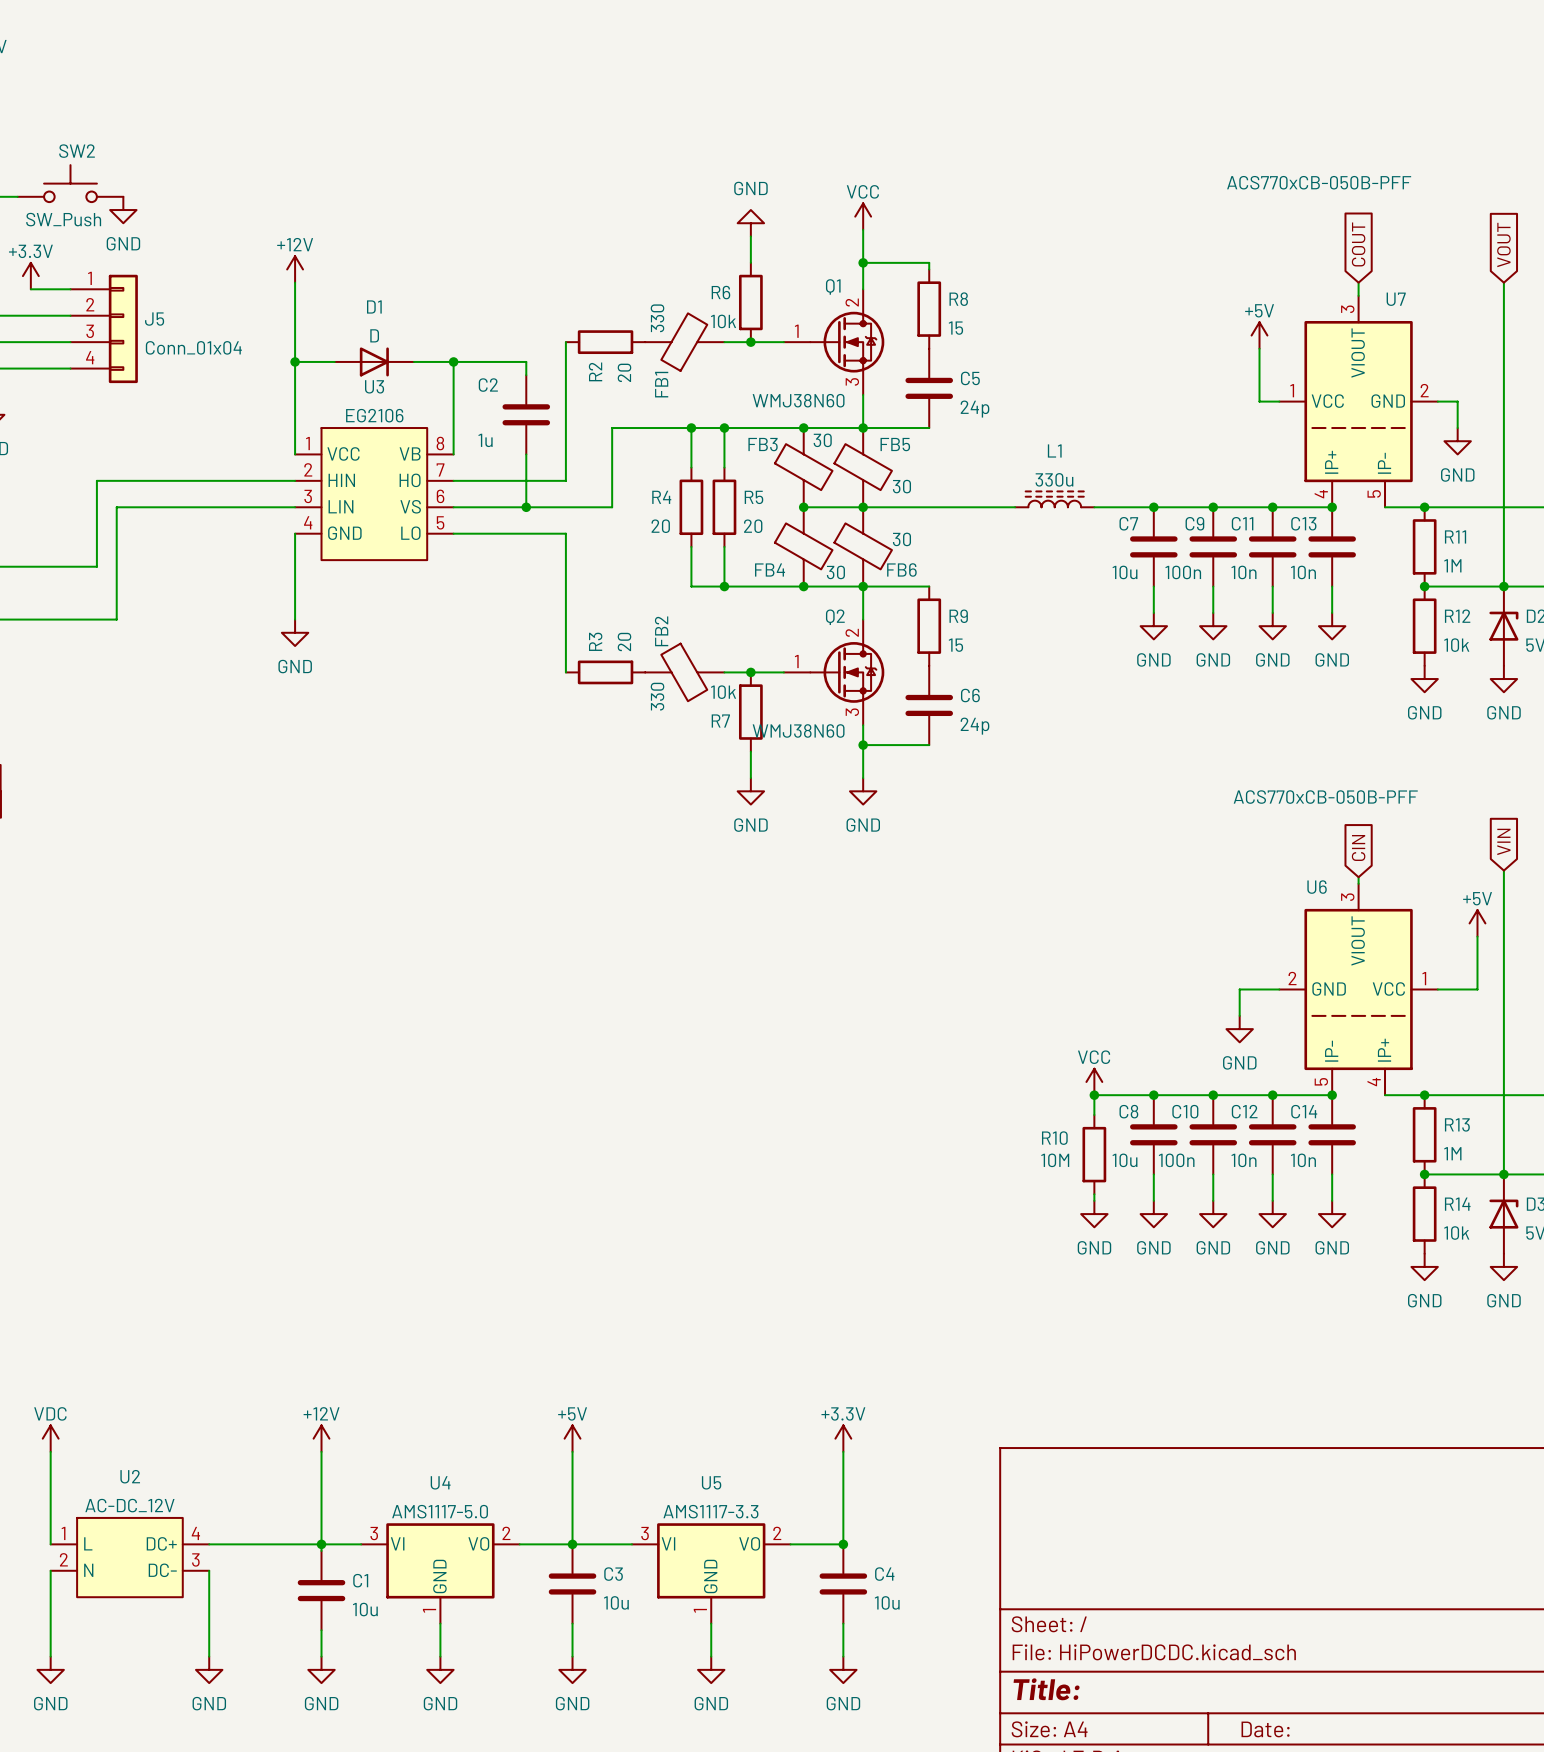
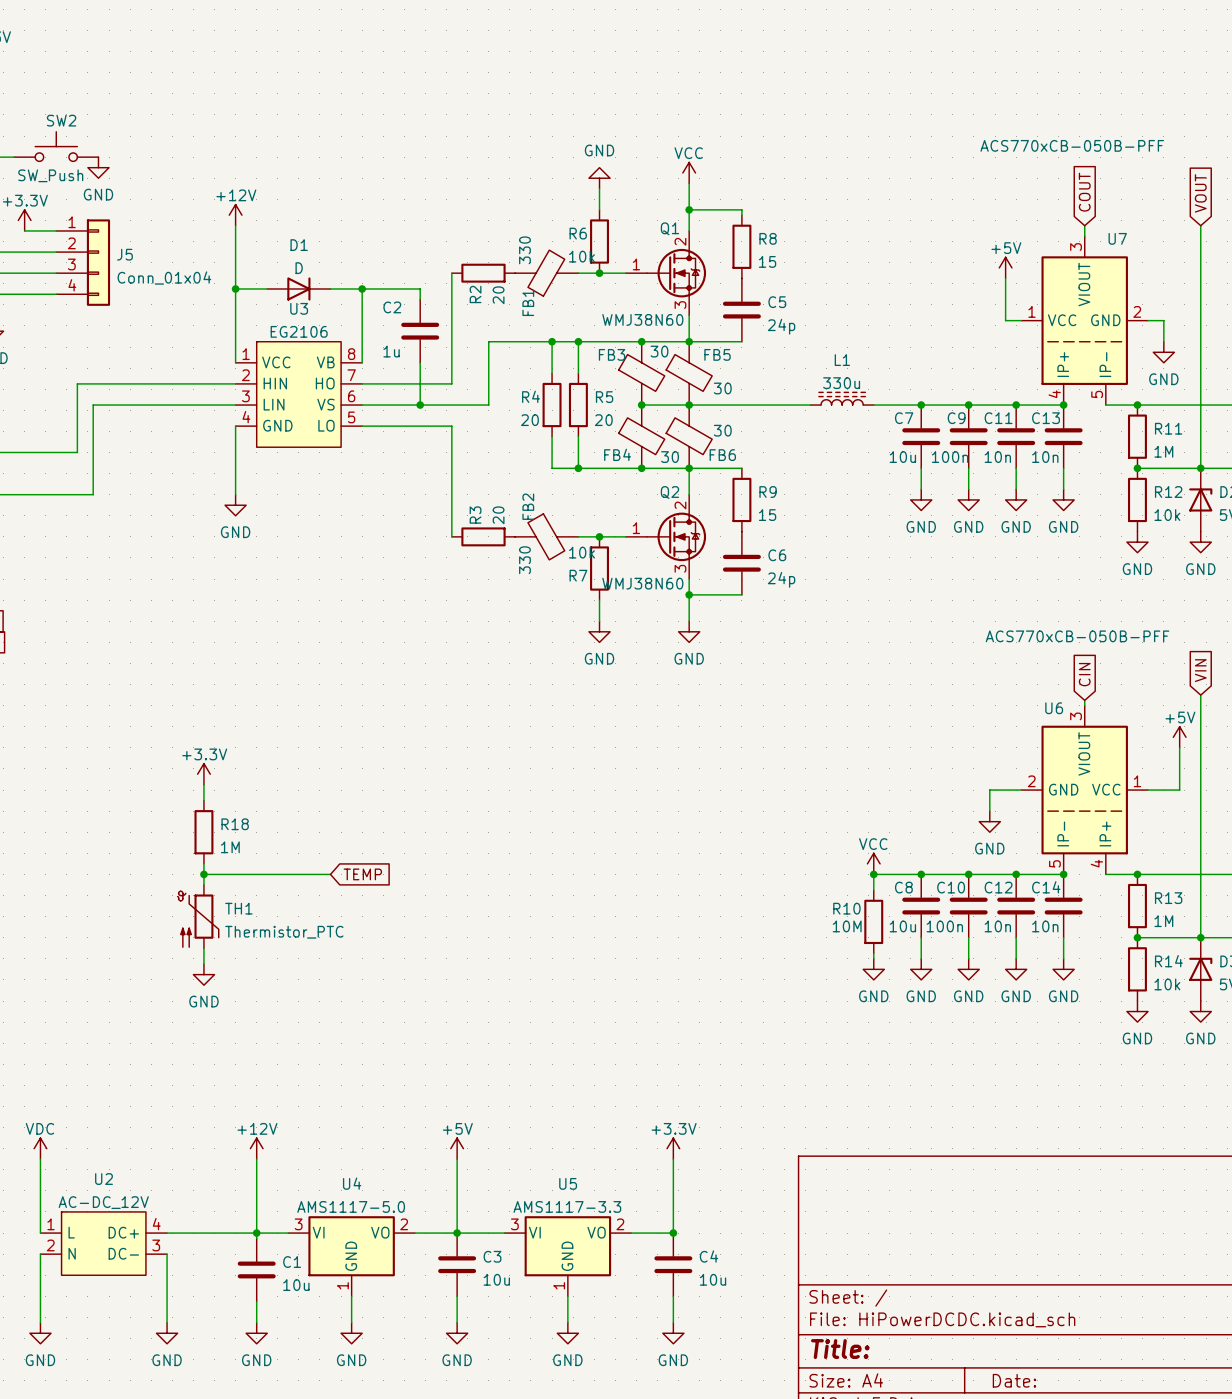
power symbol: none -> +3.3V (203, 774)
wire: none -> (203, 784) (203, 800)
R18: none -> 1M (203, 832)
wire: none -> (203, 863) (203, 884)
wire: none -> (203, 874) (330, 874)
junction: none -> (203, 874)
global label: none -> TEMP (362, 874)
TH1: none -> Thermistor_PTC (198, 916)
wire: none -> (203, 948) (203, 964)
power symbol: none -> GND (203, 974)

